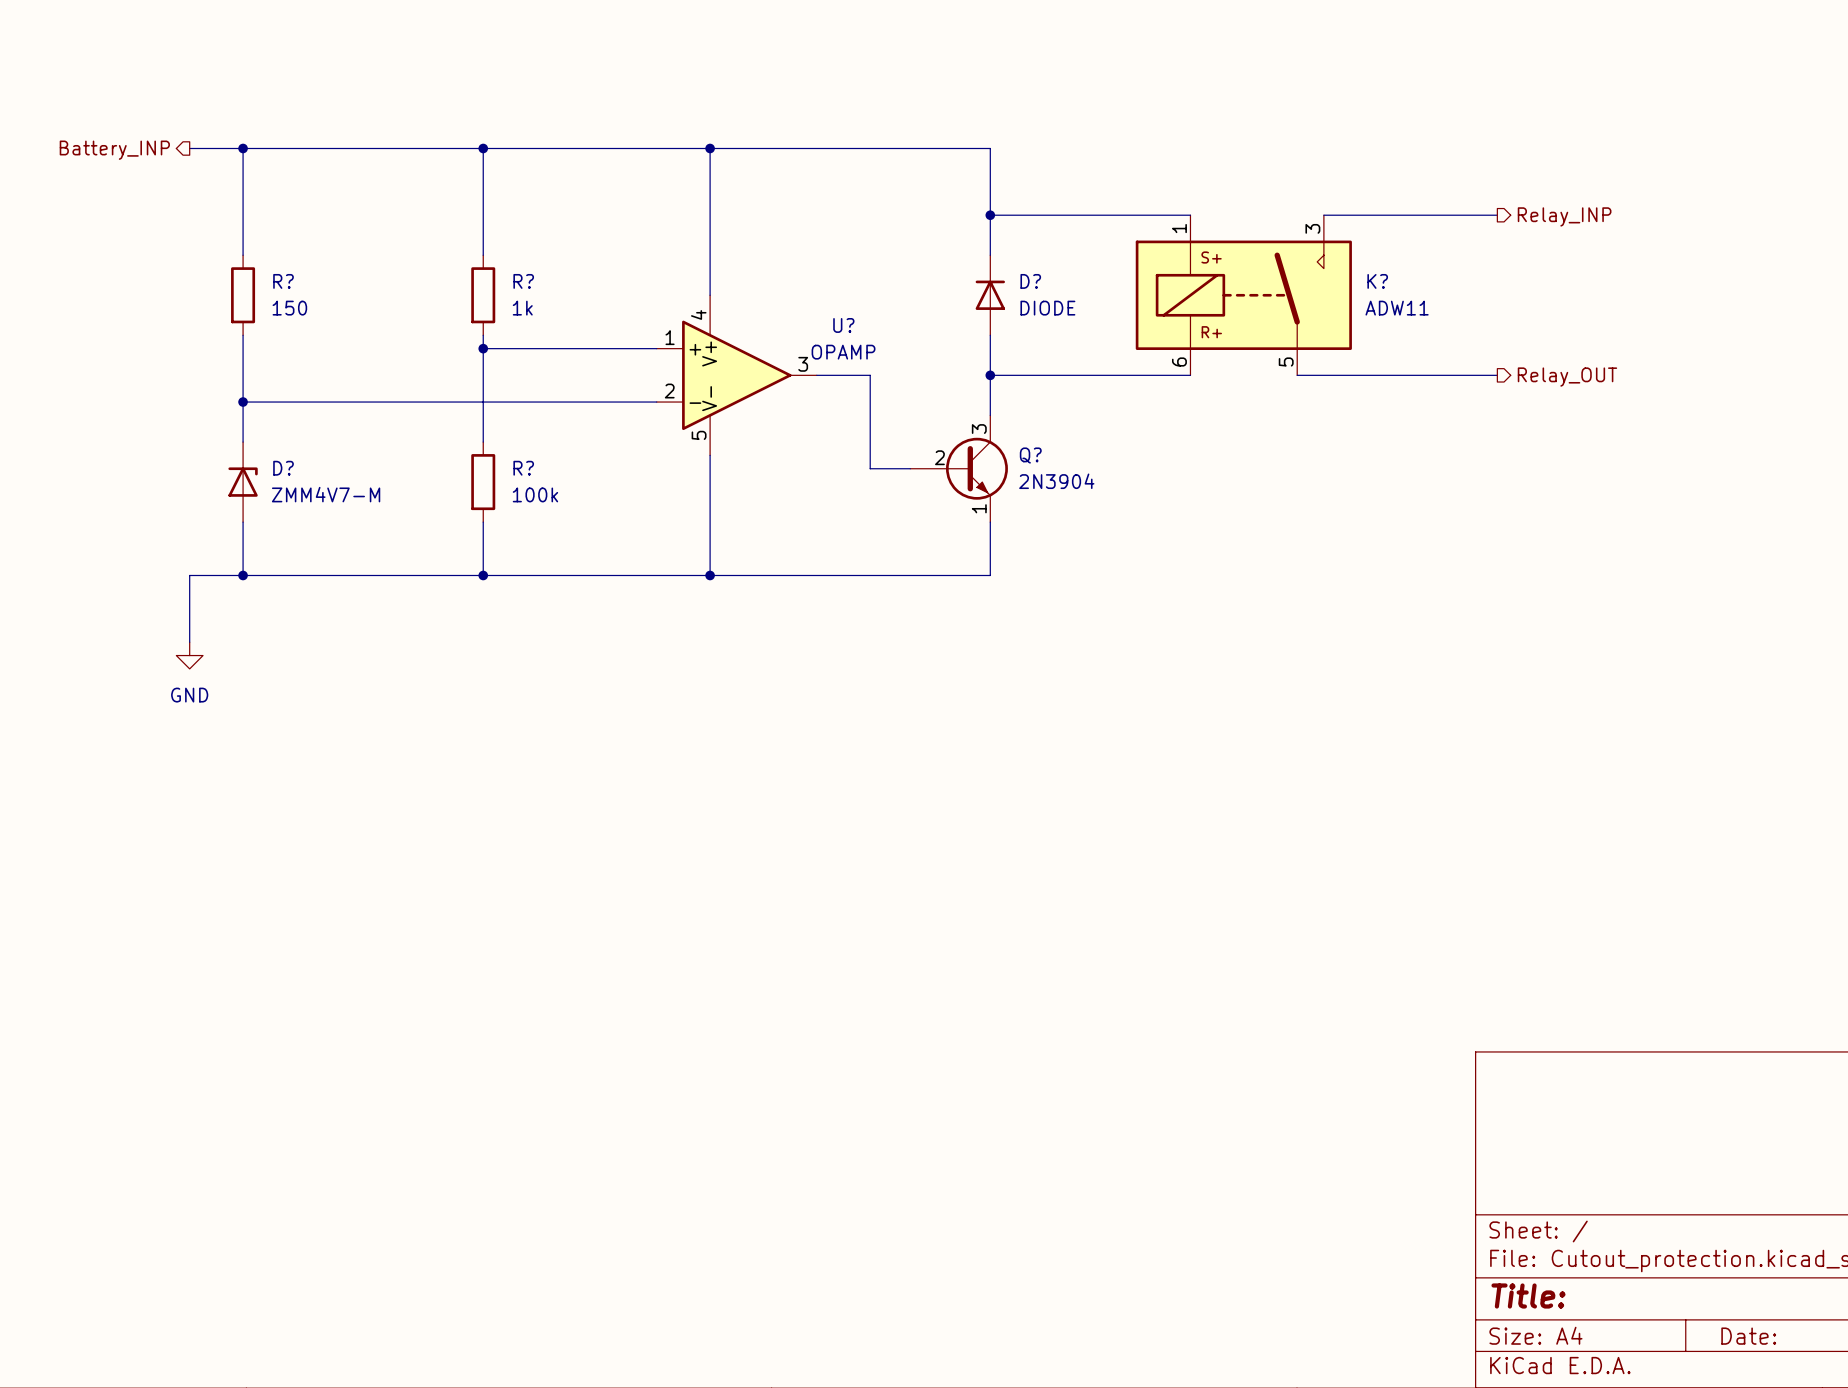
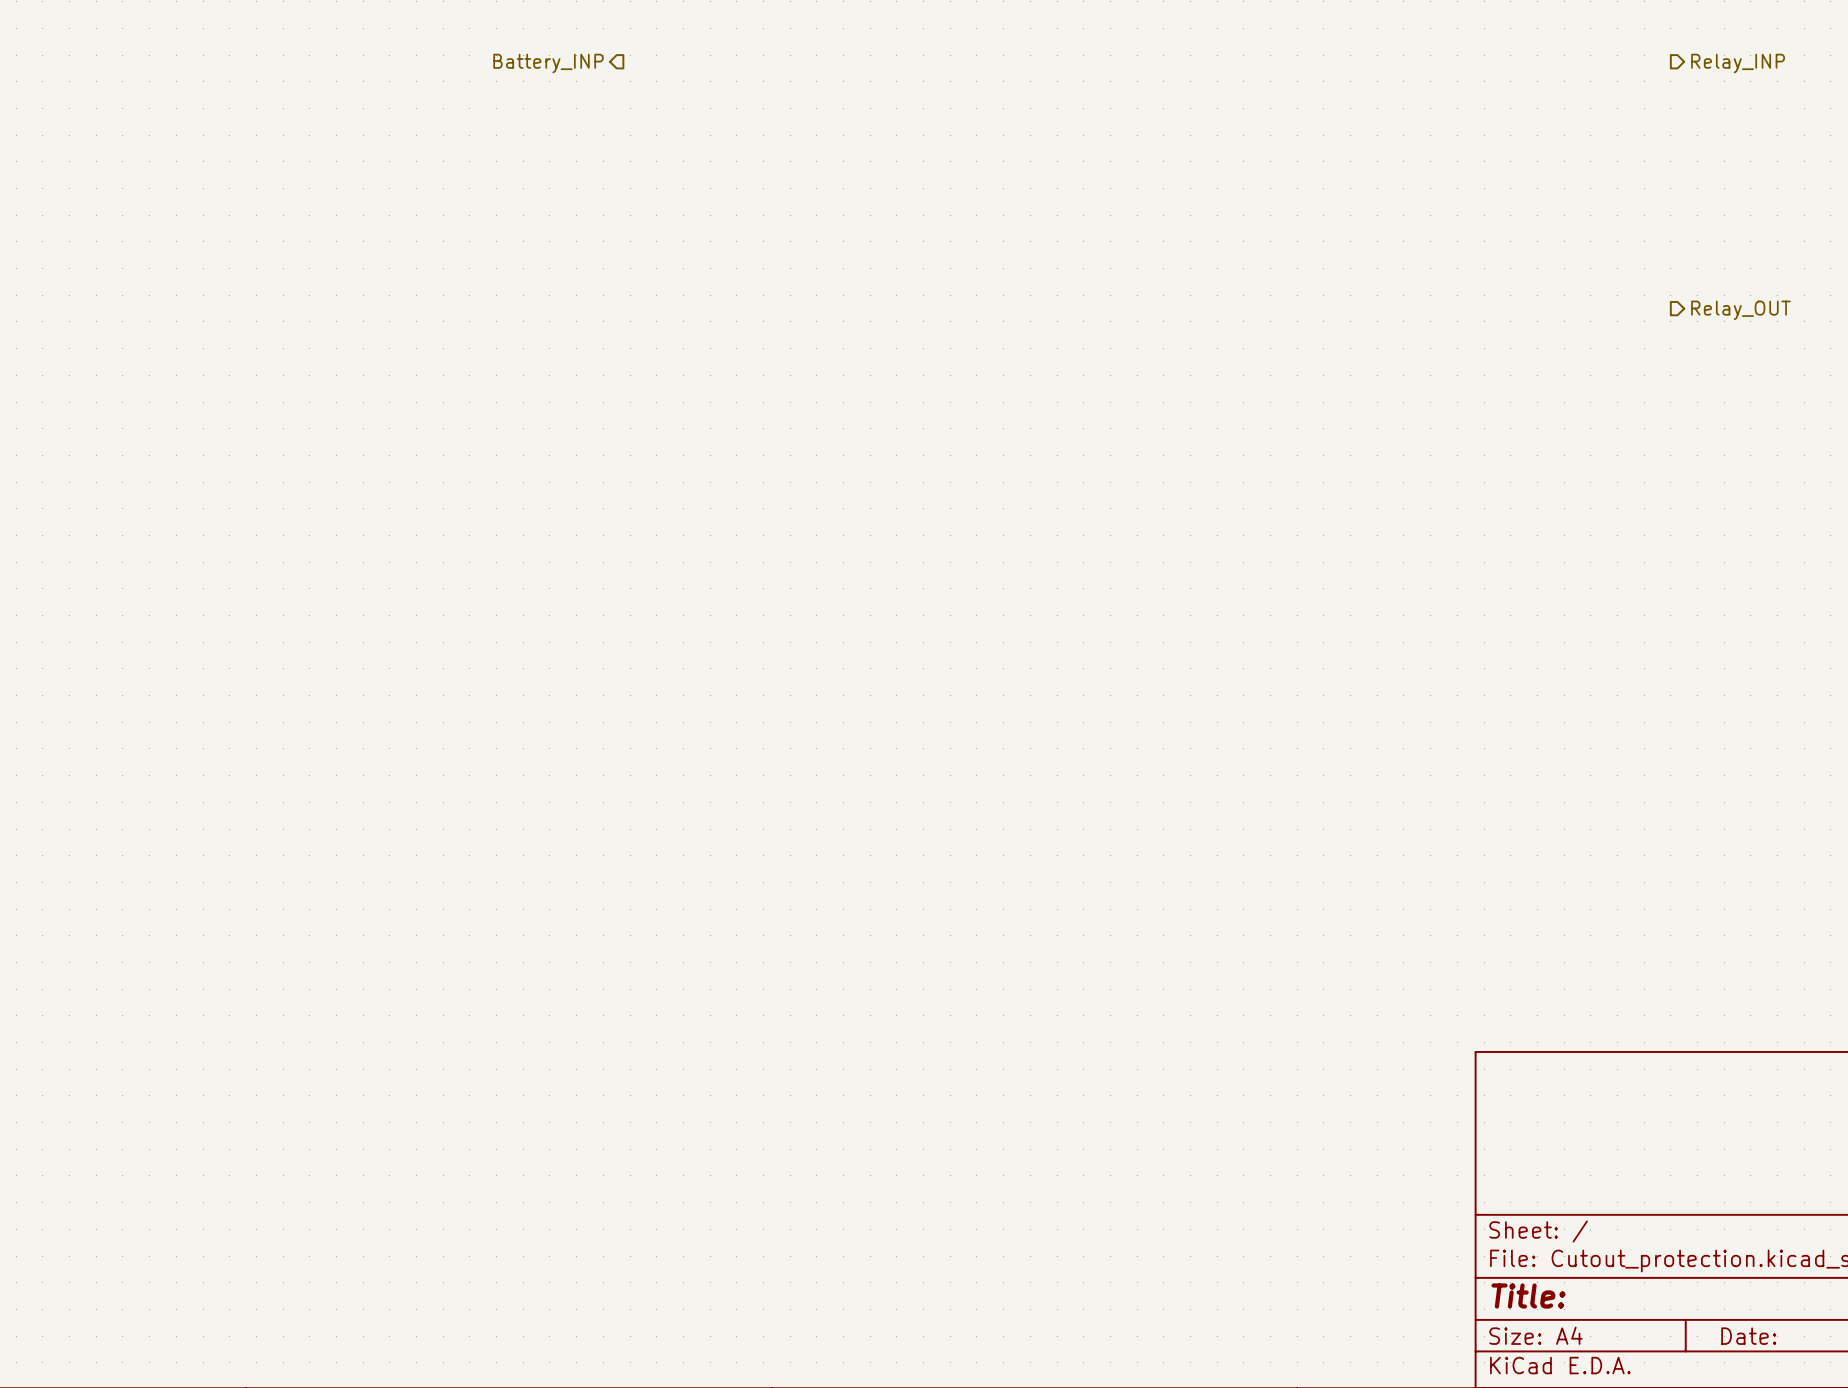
hierarchical label: none -> Battery_INP (548, 63)
wire: (189, 148) (990, 148) (990, 255) -> none
wire: (243, 148) (243, 255) -> none
junction: (243, 148) -> none
wire: (483, 148) (483, 255) -> none
junction: (483, 148) -> none
wire: (710, 148) (710, 295) -> none
junction: (710, 148) -> none
hierarchical label: Battery_INP (114, 150) -> none
wire: (990, 215) (1190, 215) -> none
junction: (990, 215) -> none
wire: (1323, 215) (1497, 215) -> none
hierarchical label position: Relay_INP (1564, 216) -> Relay_INP (1738, 63)
R?: 150 (243, 295) -> none
R?: 1k (483, 295) -> none
D?: DIODE (990, 295) -> none
K?: ADW11 (1243, 295) -> none
wire: (243, 335) (243, 442) -> none
wire: (483, 335) (483, 442) -> none
wire: (990, 335) (990, 415) -> none
wire: (483, 348) (656, 348) -> none
junction: (483, 348) -> none
U?: OPAMP (736, 375) -> none
wire: (816, 375) (870, 375) (870, 468) (910, 468) -> none
wire: (990, 375) (1190, 375) -> none
junction: (990, 375) -> none
wire: (1297, 375) (1497, 375) -> none
hierarchical label position: Relay_OUT (1567, 377) -> Relay_OUT (1740, 310)
wire: (243, 402) (656, 402) -> none
junction: (243, 402) -> none
wire: (710, 455) (710, 575) -> none
Q?: 2N3904 (959, 468) -> none
D?: ZMM4V7-M (243, 482) -> none
R?: 100k (483, 482) -> none
wire: (243, 522) (243, 575) -> none
wire: (483, 522) (483, 575) -> none
wire: (990, 522) (990, 575) (189, 575) (189, 642) -> none
junction: (243, 575) -> none
junction: (483, 575) -> none
junction: (710, 575) -> none
power symbol: GND (189, 655) -> none

